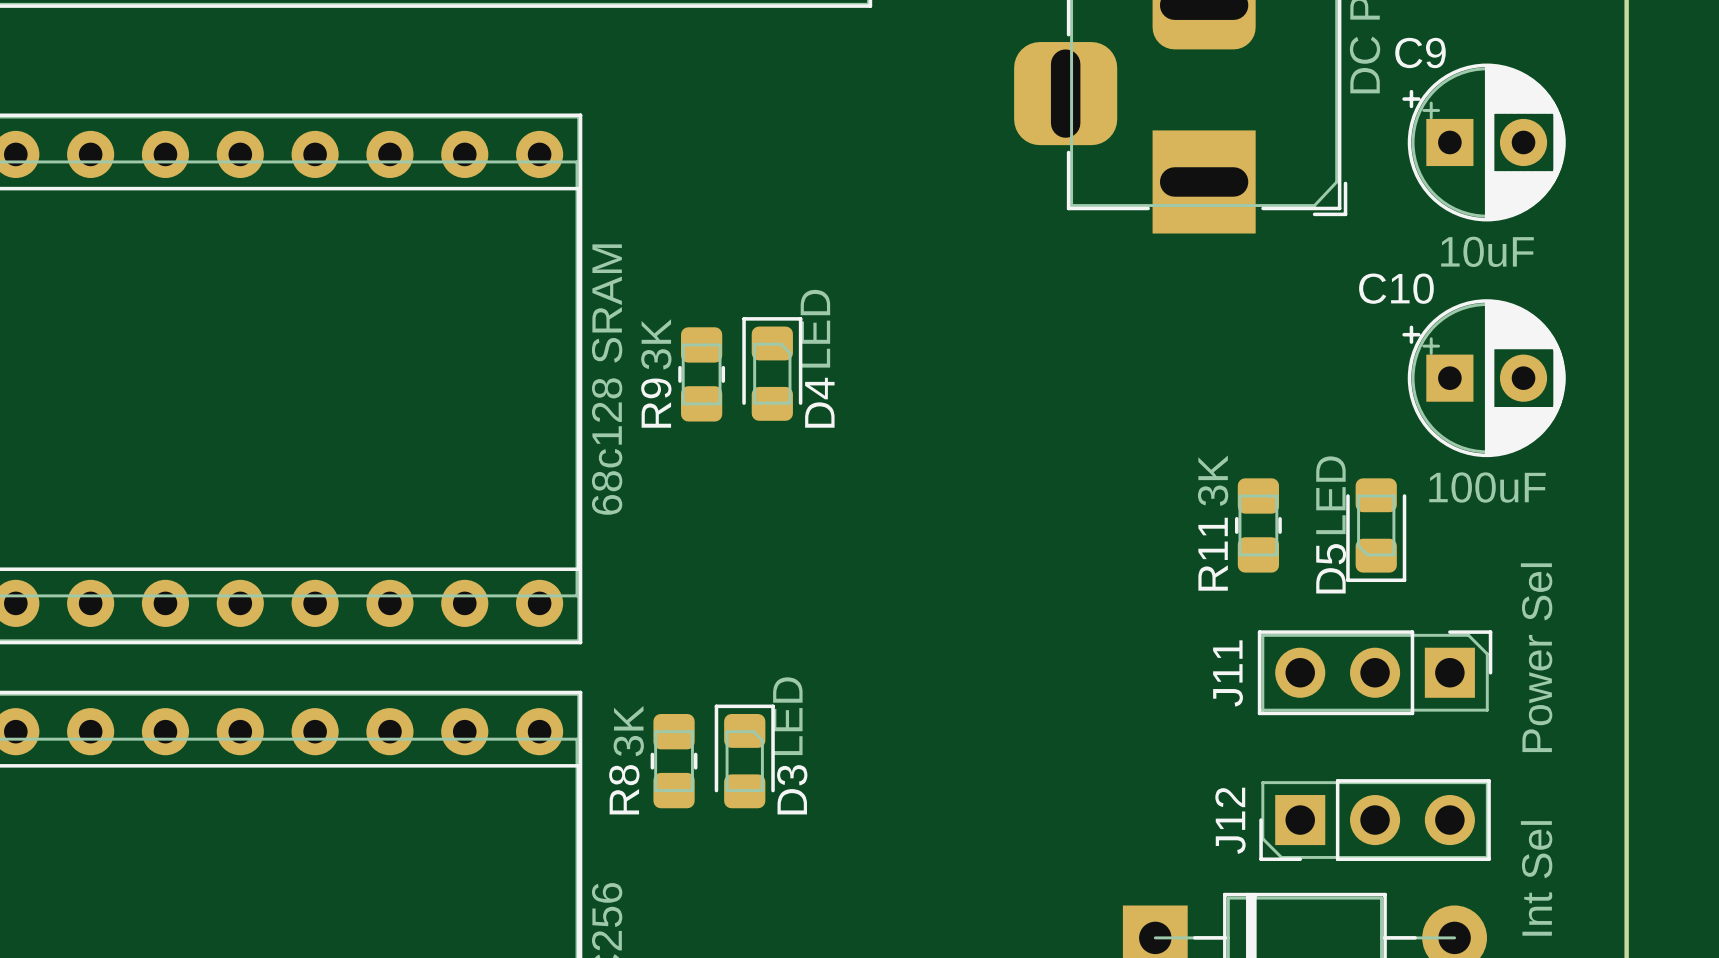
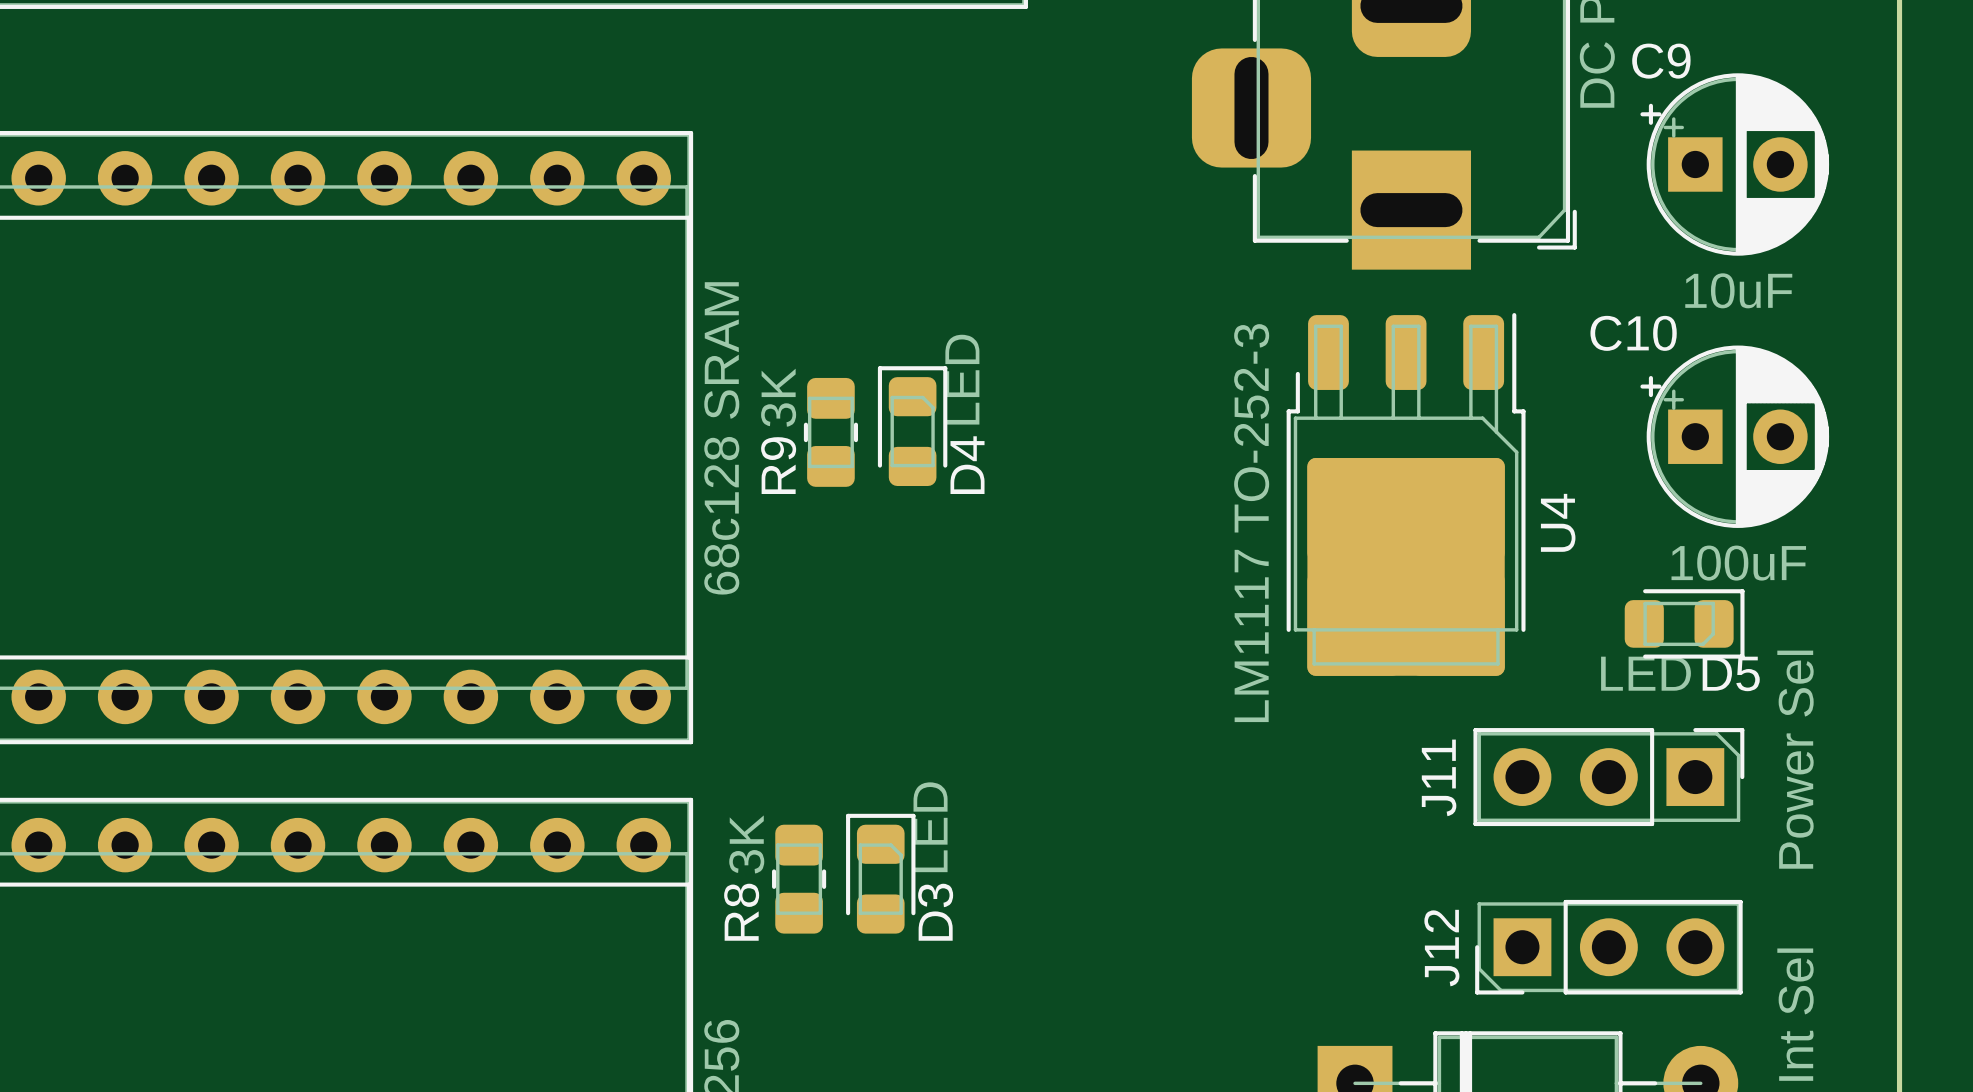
U4: none -> LM1117 TO-252-3 (1406, 494)
R11: 3K (1258, 525) -> none
D5 rotation: 0° (1376, 530) -> 90° counterclockwise (1684, 623)
D5 position: (1376, 530) -> (1684, 623)

